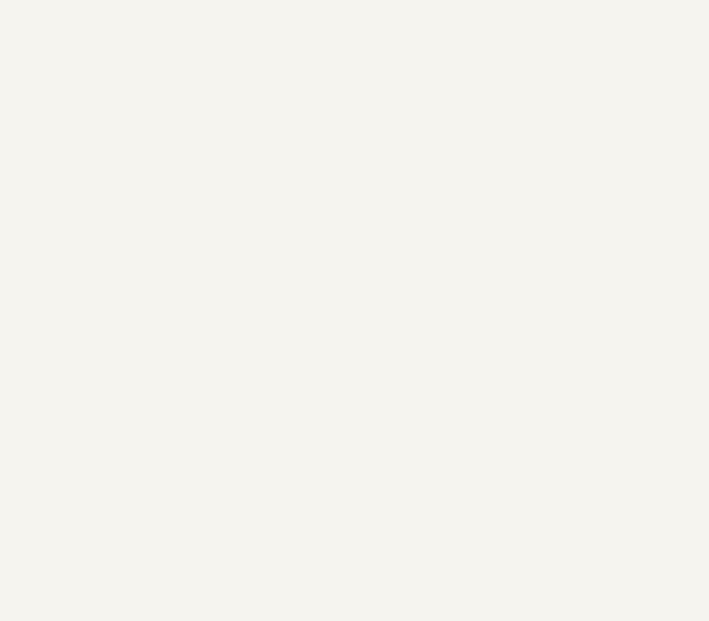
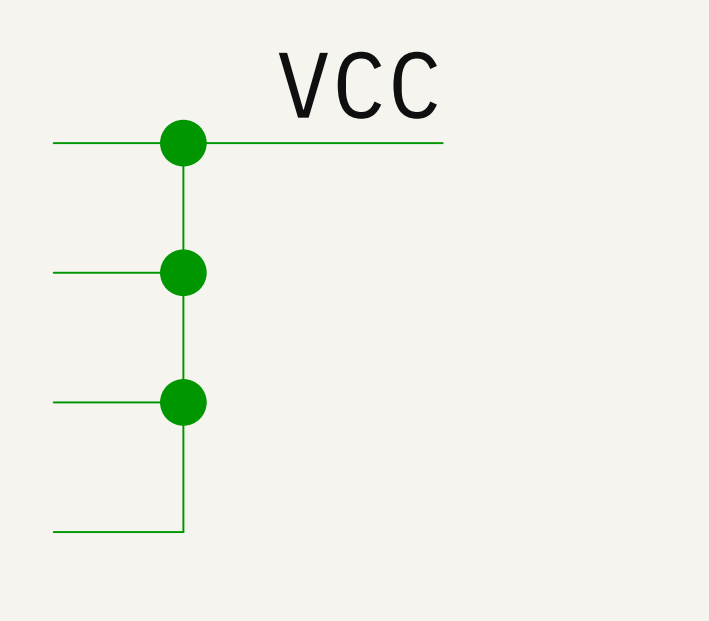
label: none -> VCC (357, 85)
wire: none -> (53, 143) (442, 143)
wire: none -> (183, 143) (183, 532) (53, 532)
junction: none -> (183, 143)
wire: none -> (53, 272) (183, 272)
junction: none -> (183, 272)
wire: none -> (53, 402) (183, 402)
junction: none -> (183, 402)

